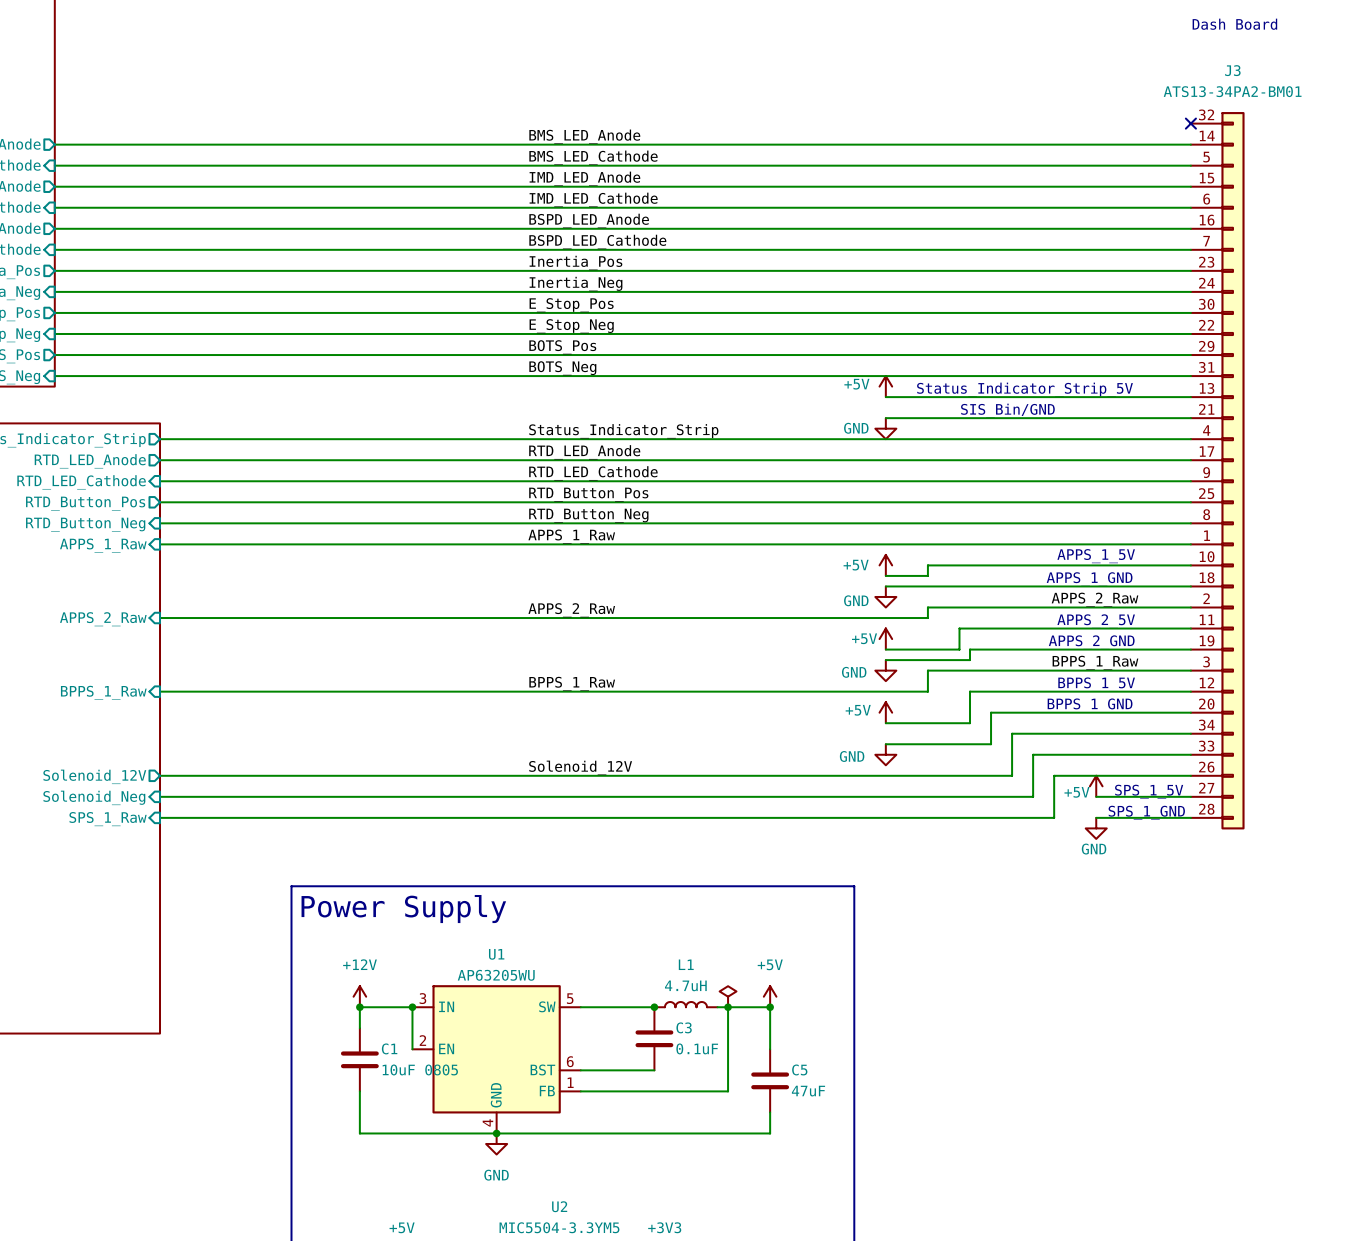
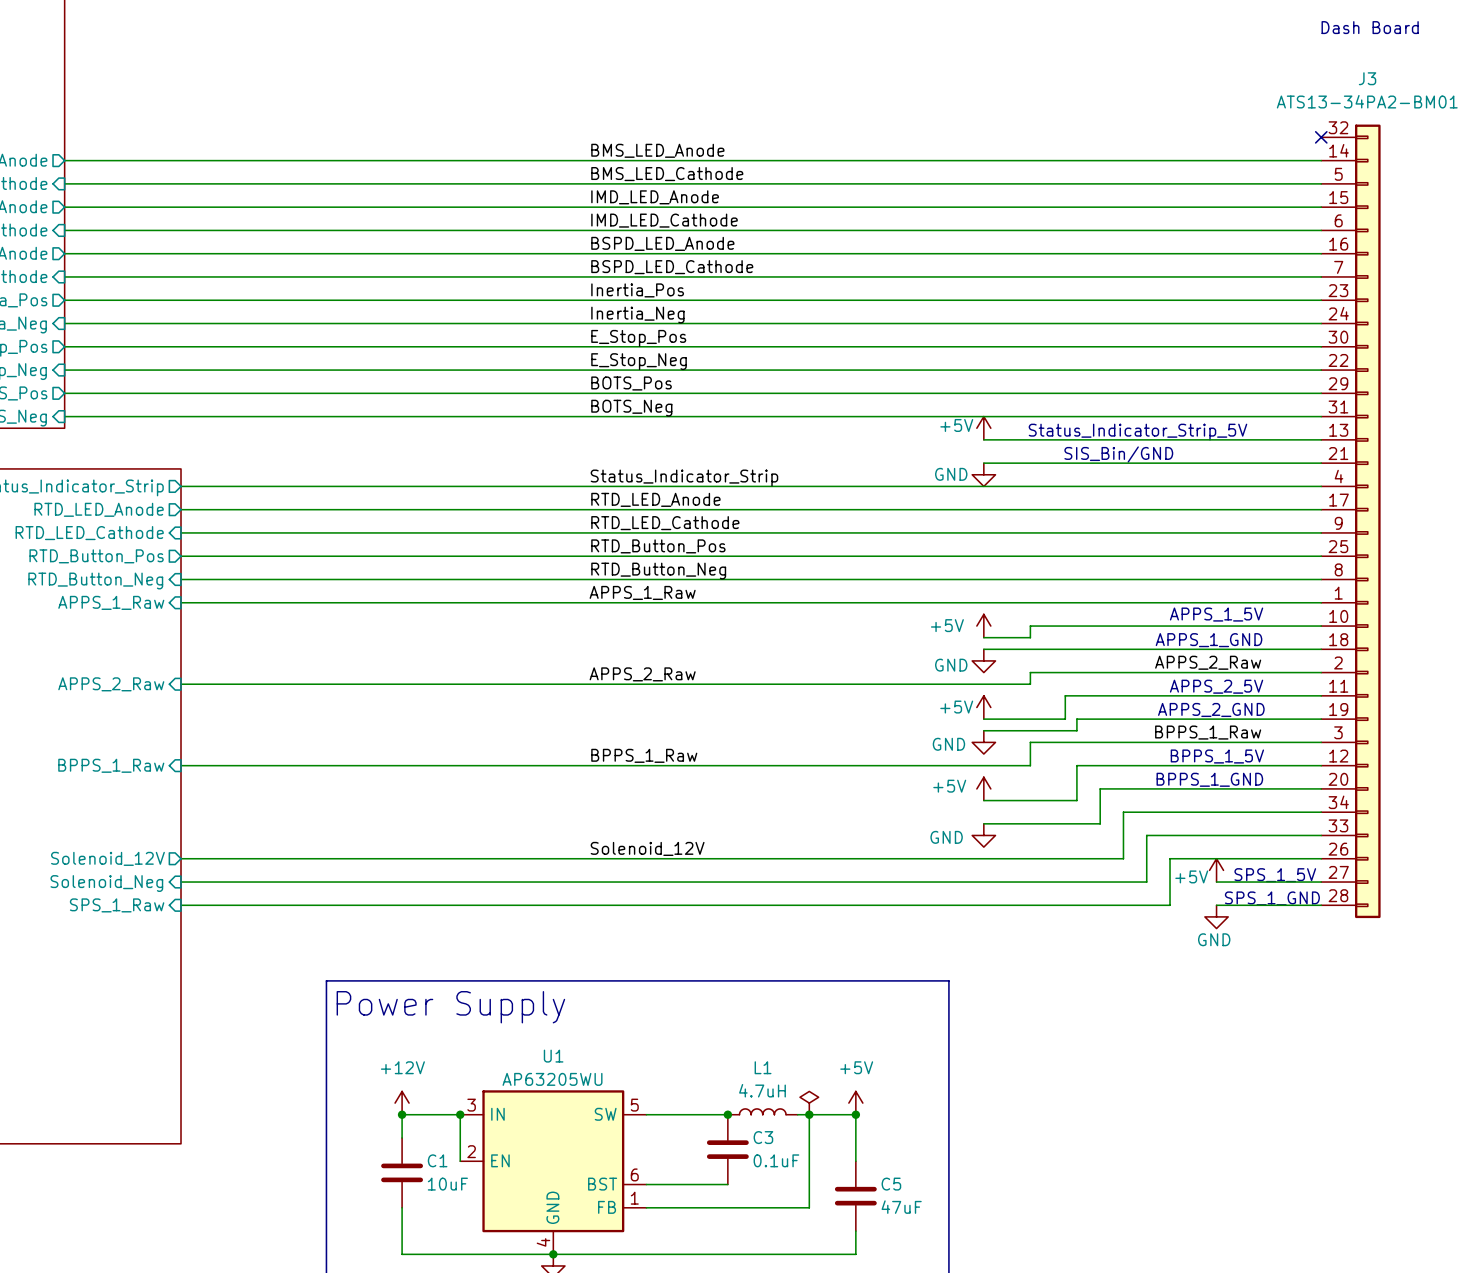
C1 value: 10uF 0805 (420, 1069) -> 10uF (447, 1184)

